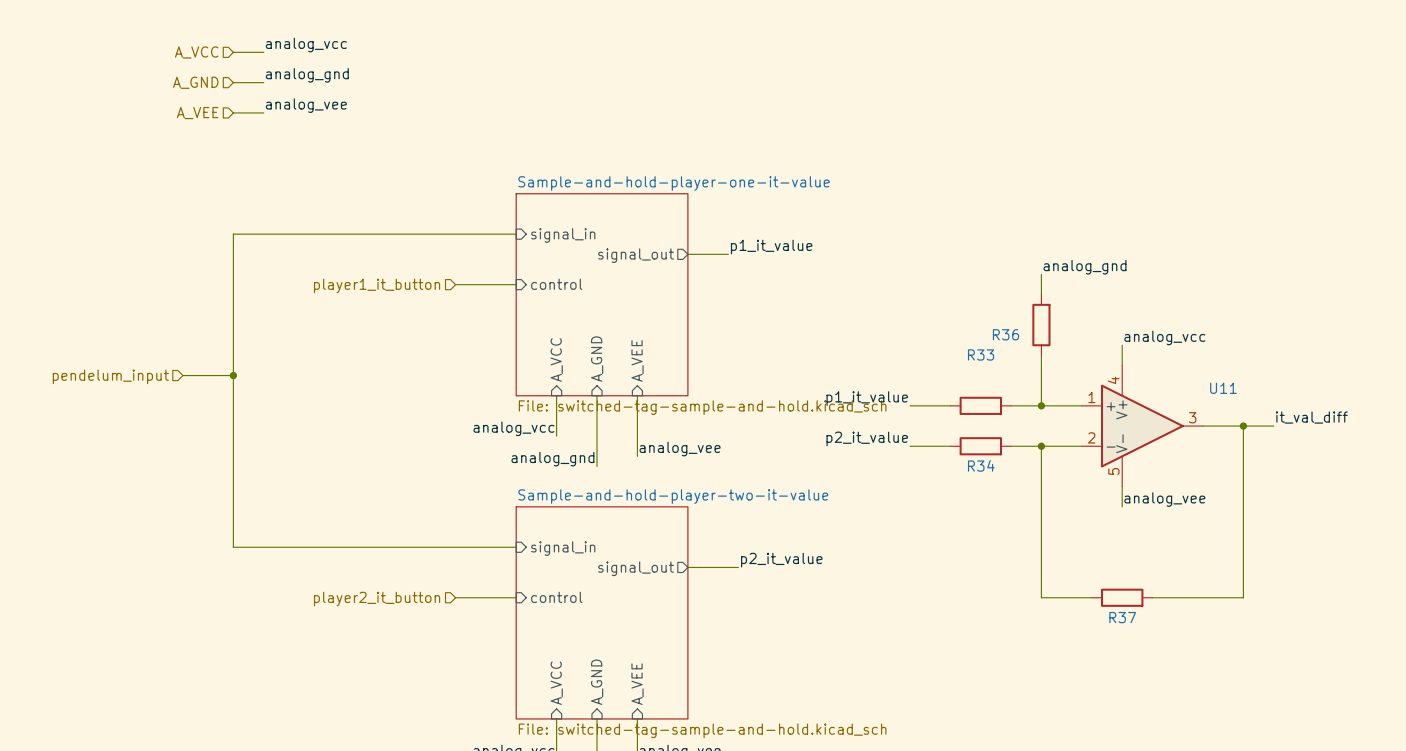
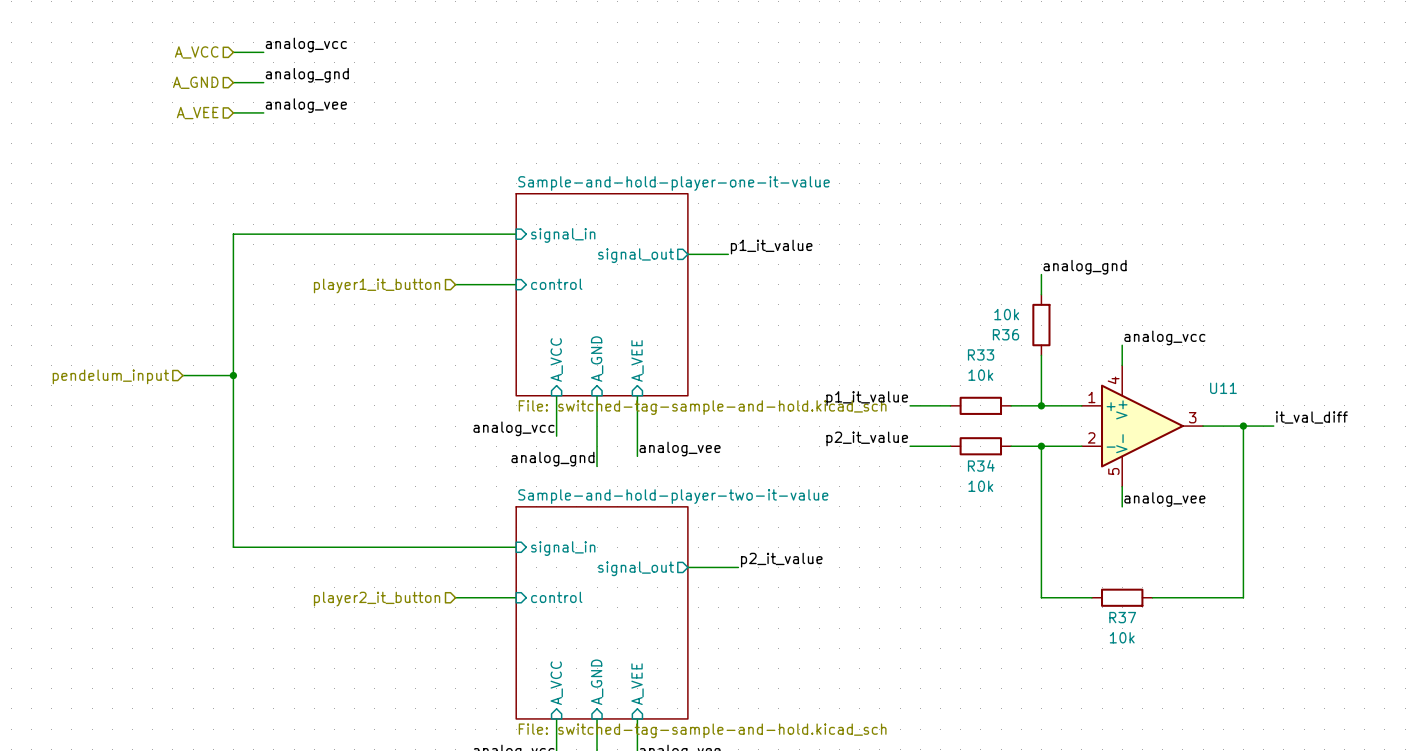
R36 value: none -> 10k (1006, 314)
R33 value: none -> 10k (980, 375)
R34 value: none -> 10k (980, 486)
R37 value: none -> 10k (1122, 637)

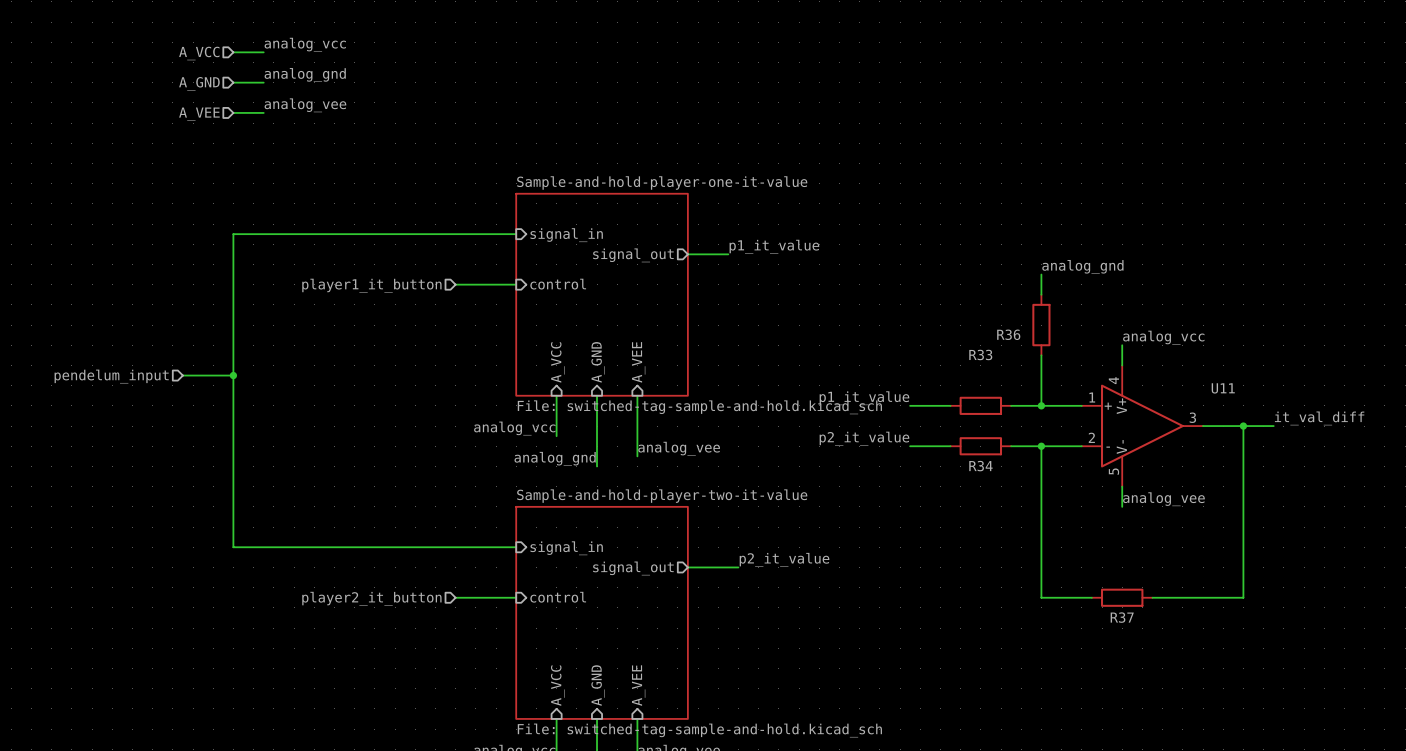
R36 value: 10k (1006, 314) -> none
R33 value: 10k (980, 375) -> none
R34 value: 10k (980, 486) -> none
R37 value: 10k (1122, 637) -> none

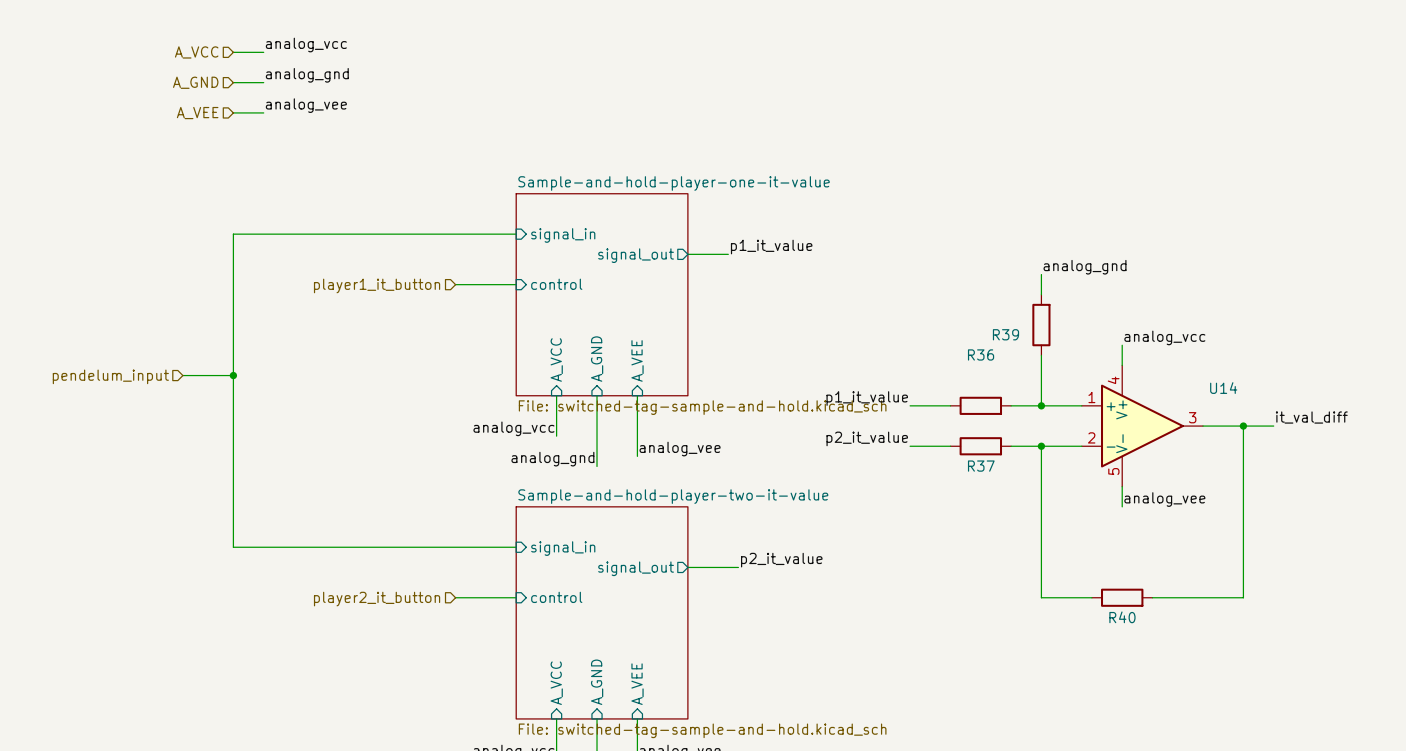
R36 name: R36 (1008, 334) -> R39 (1005, 334)
R33 name: R33 (980, 354) -> R36 (981, 354)
U11 name: U11 (1223, 388) -> U14 (1223, 388)
R34 name: R34 (980, 466) -> R37 (981, 466)
R37 name: R37 (1122, 617) -> R40 (1122, 617)

